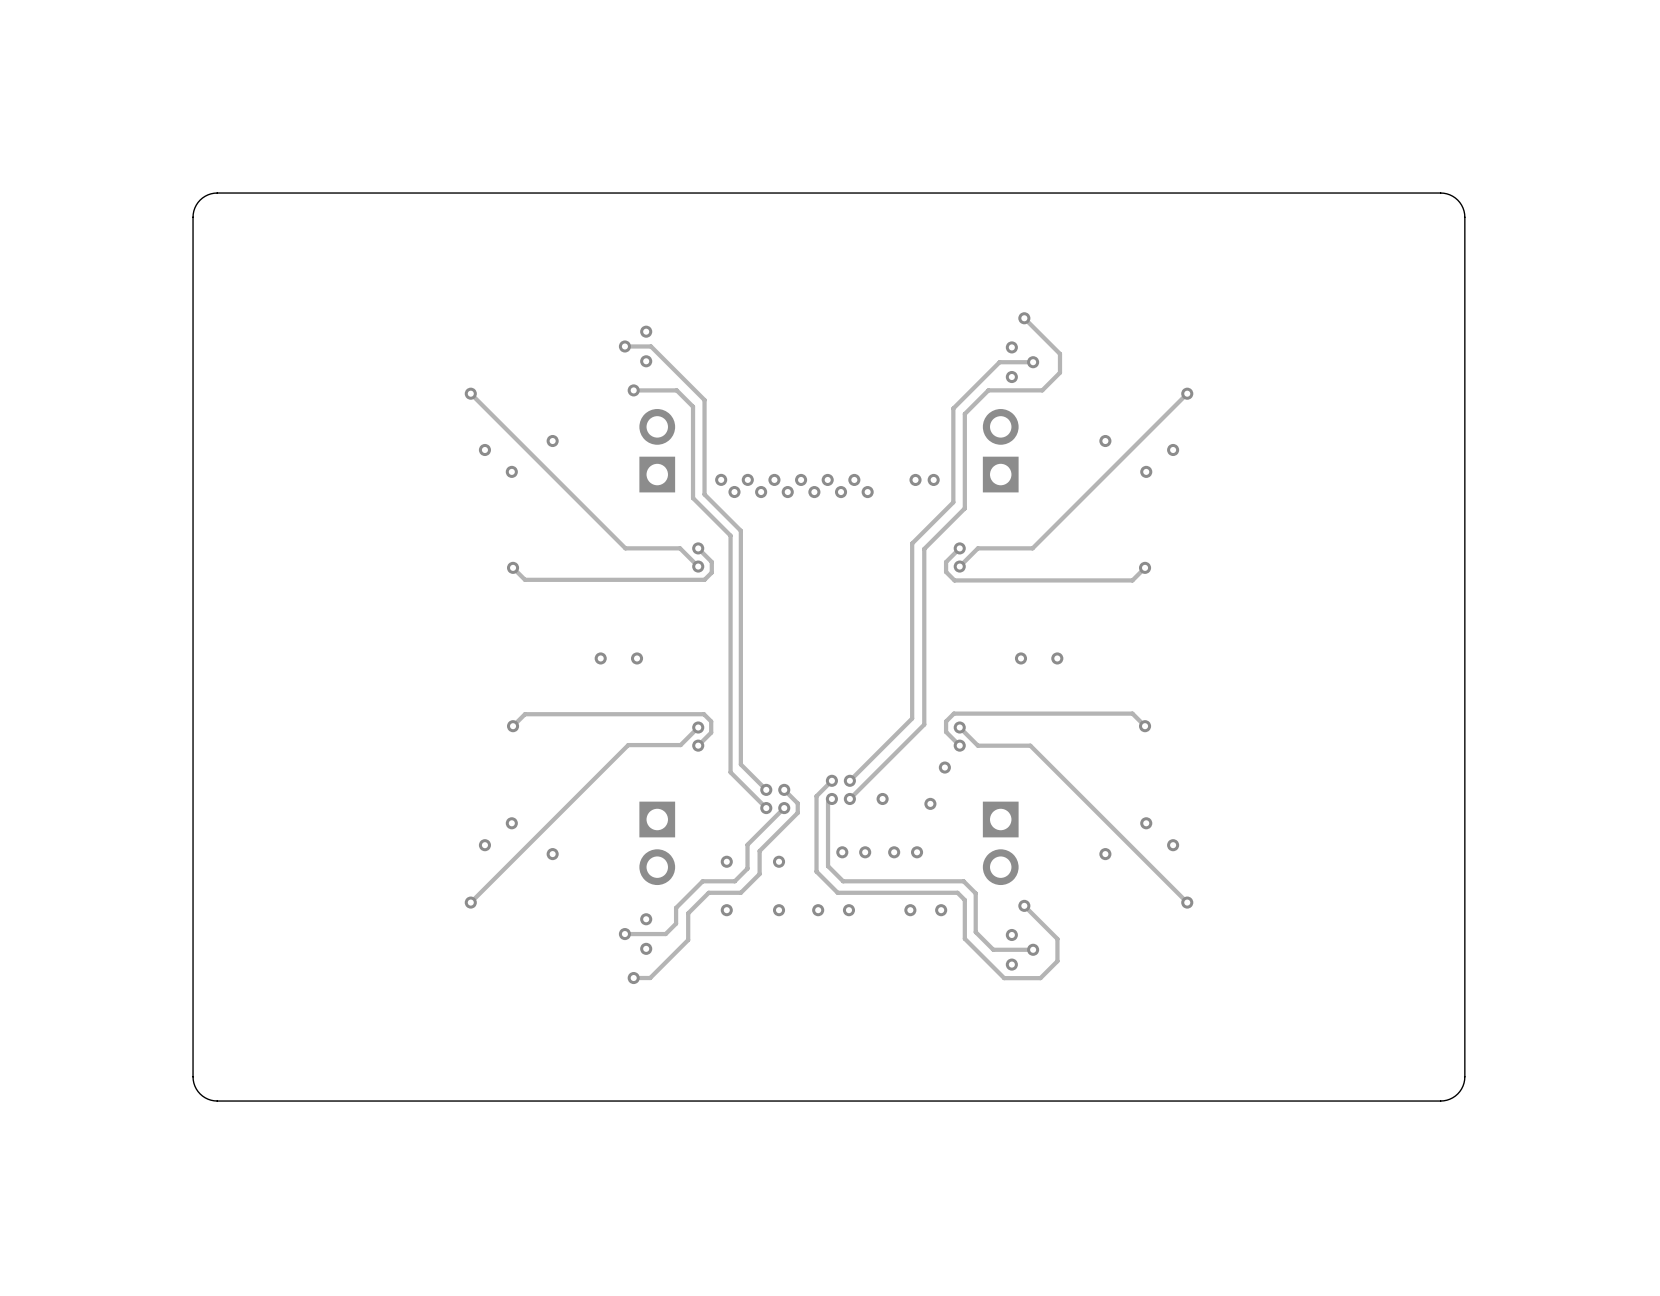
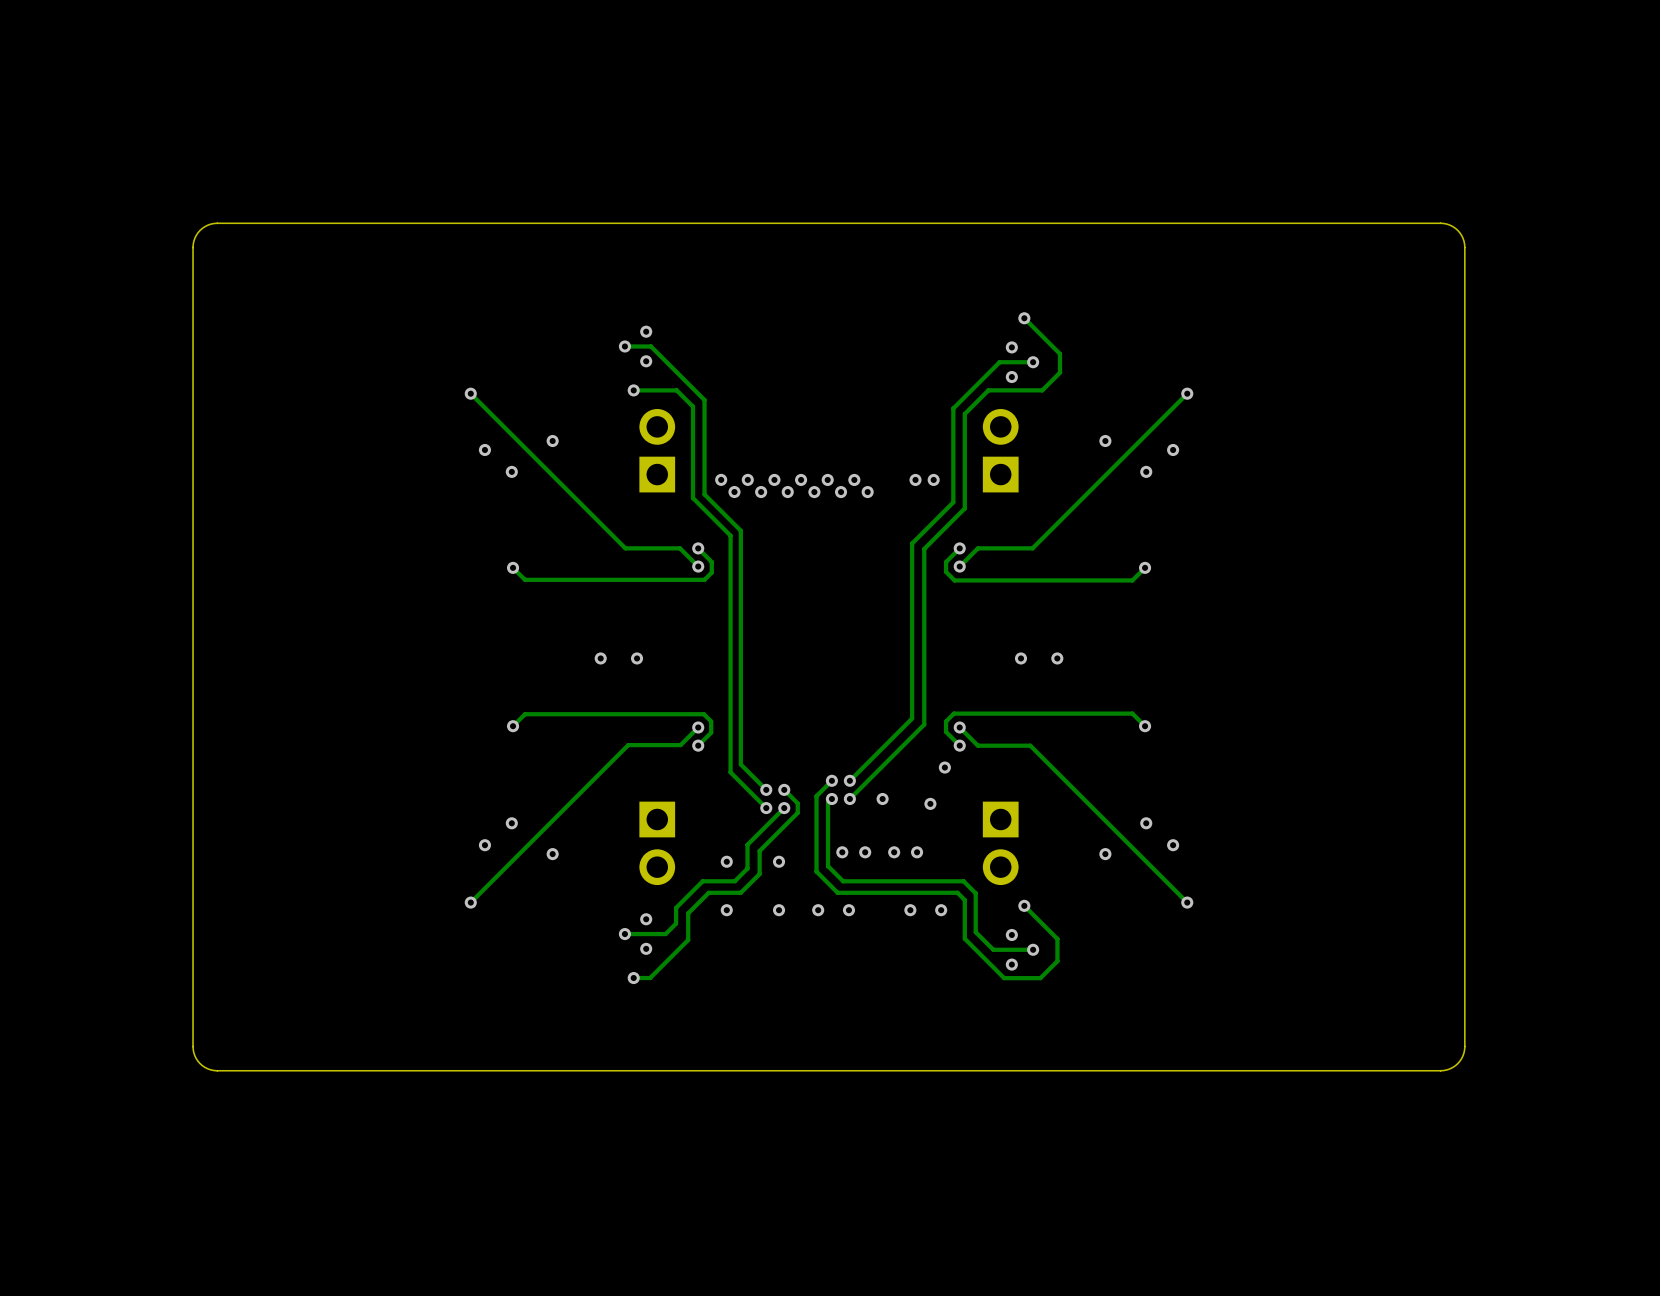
board edge: (1464, 247) (1462, 207) (1452, 196) (1440, 193) (217, 193) (202, 198) (194, 207) (193, 247) -> (1464, 247) (1462, 238) (1457, 230) (1449, 225) (1440, 223) (217, 223) (207, 225) (200, 230) (194, 238) (193, 247)
board edge: (1464, 1046) (1462, 1086) (1452, 1097) (1440, 1101) (217, 1101) (205, 1097) (194, 1086) (193, 1046) -> (1464, 1046) (1462, 1055) (1457, 1063) (1449, 1068) (1440, 1070) (217, 1070) (207, 1068) (200, 1063) (194, 1055) (193, 1046)

